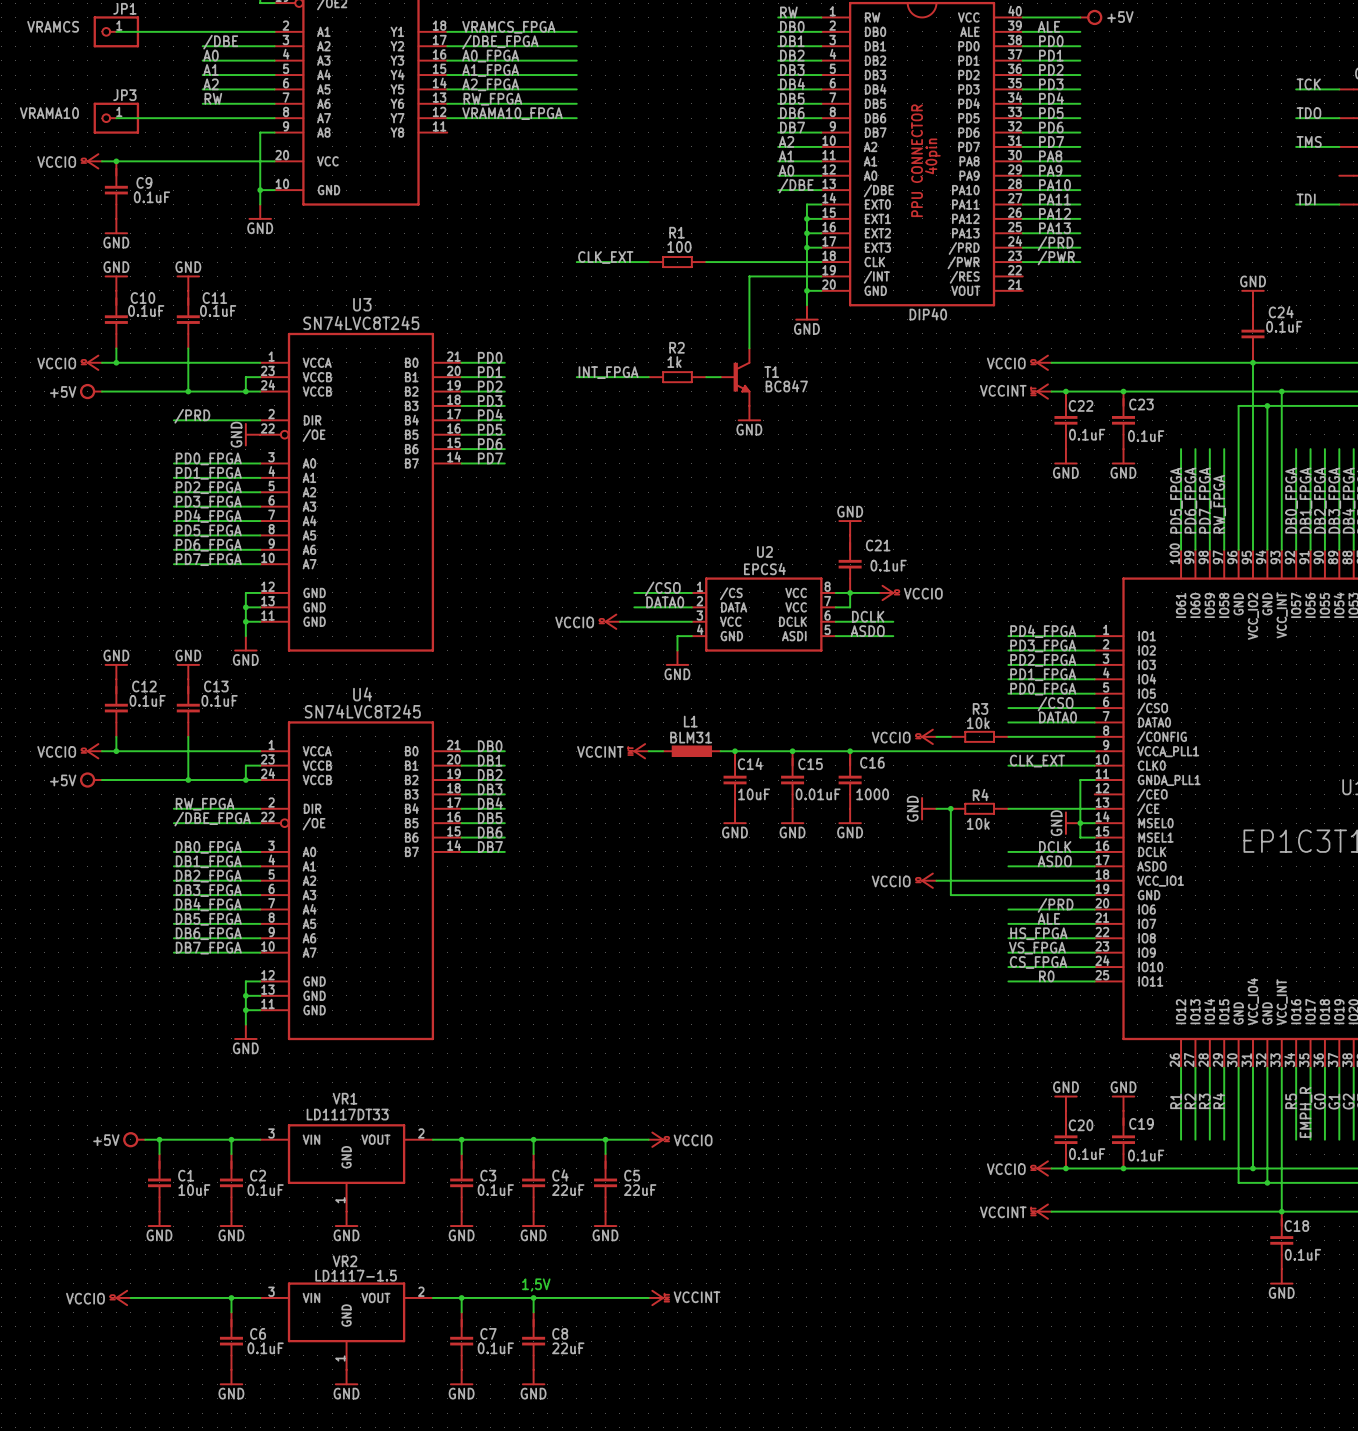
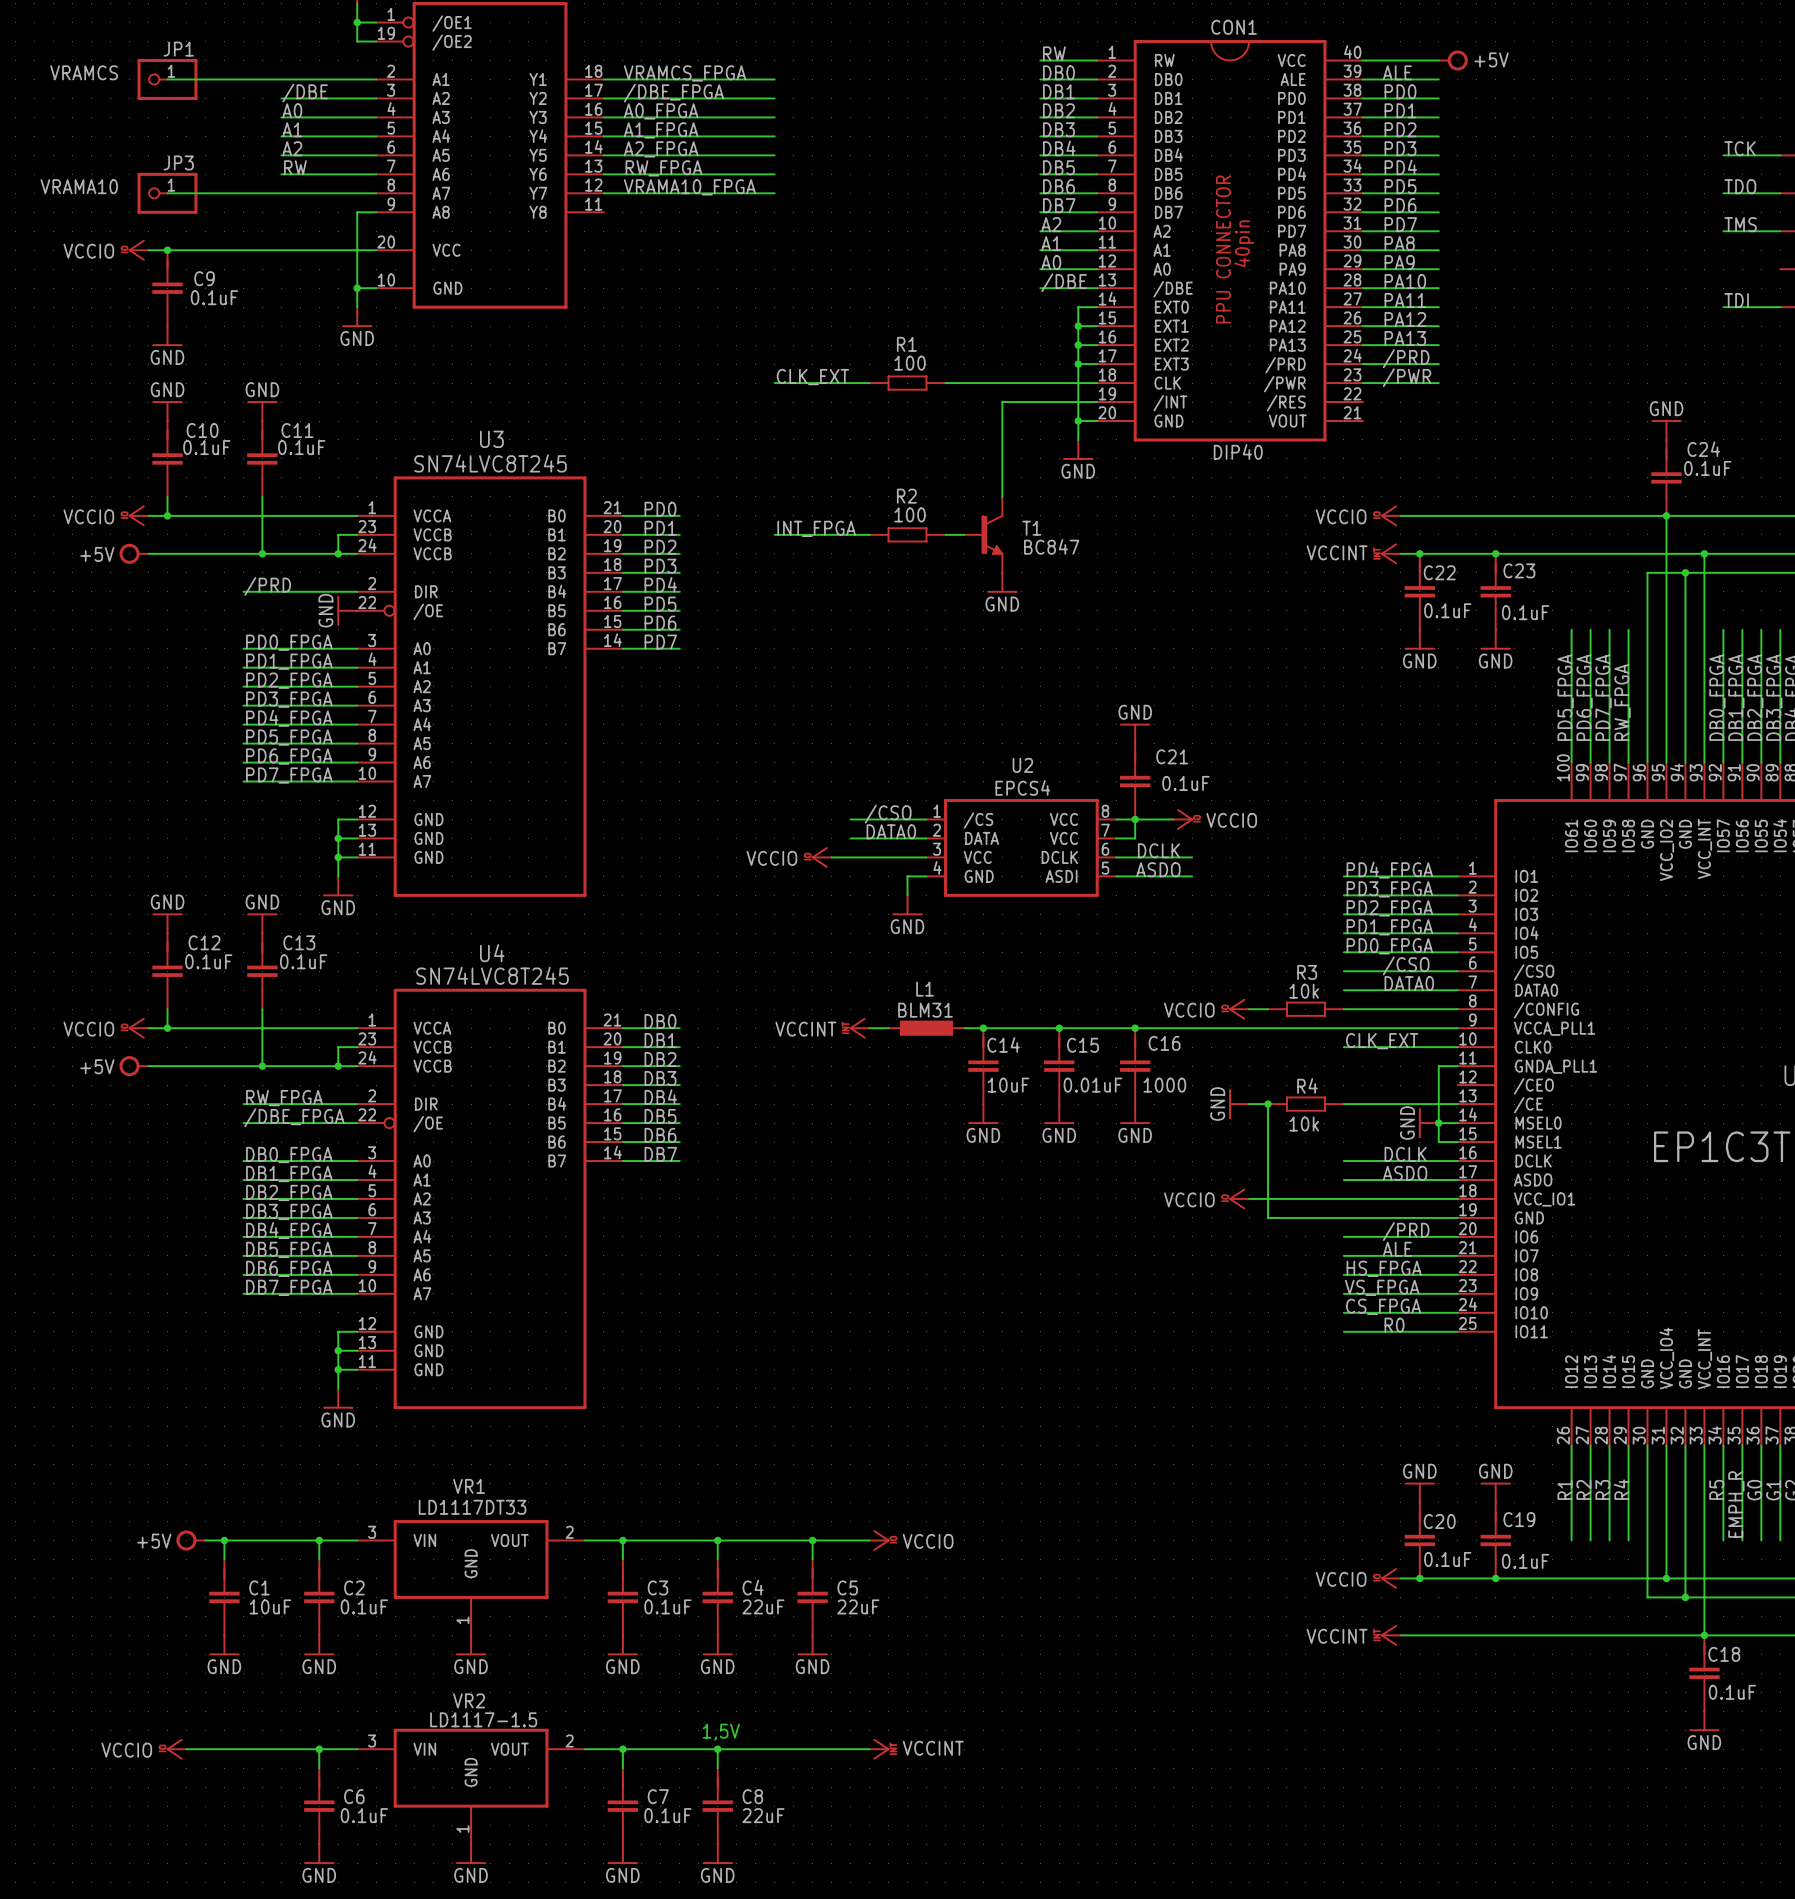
R2 value: 1k (674, 362) -> 100 (910, 514)

